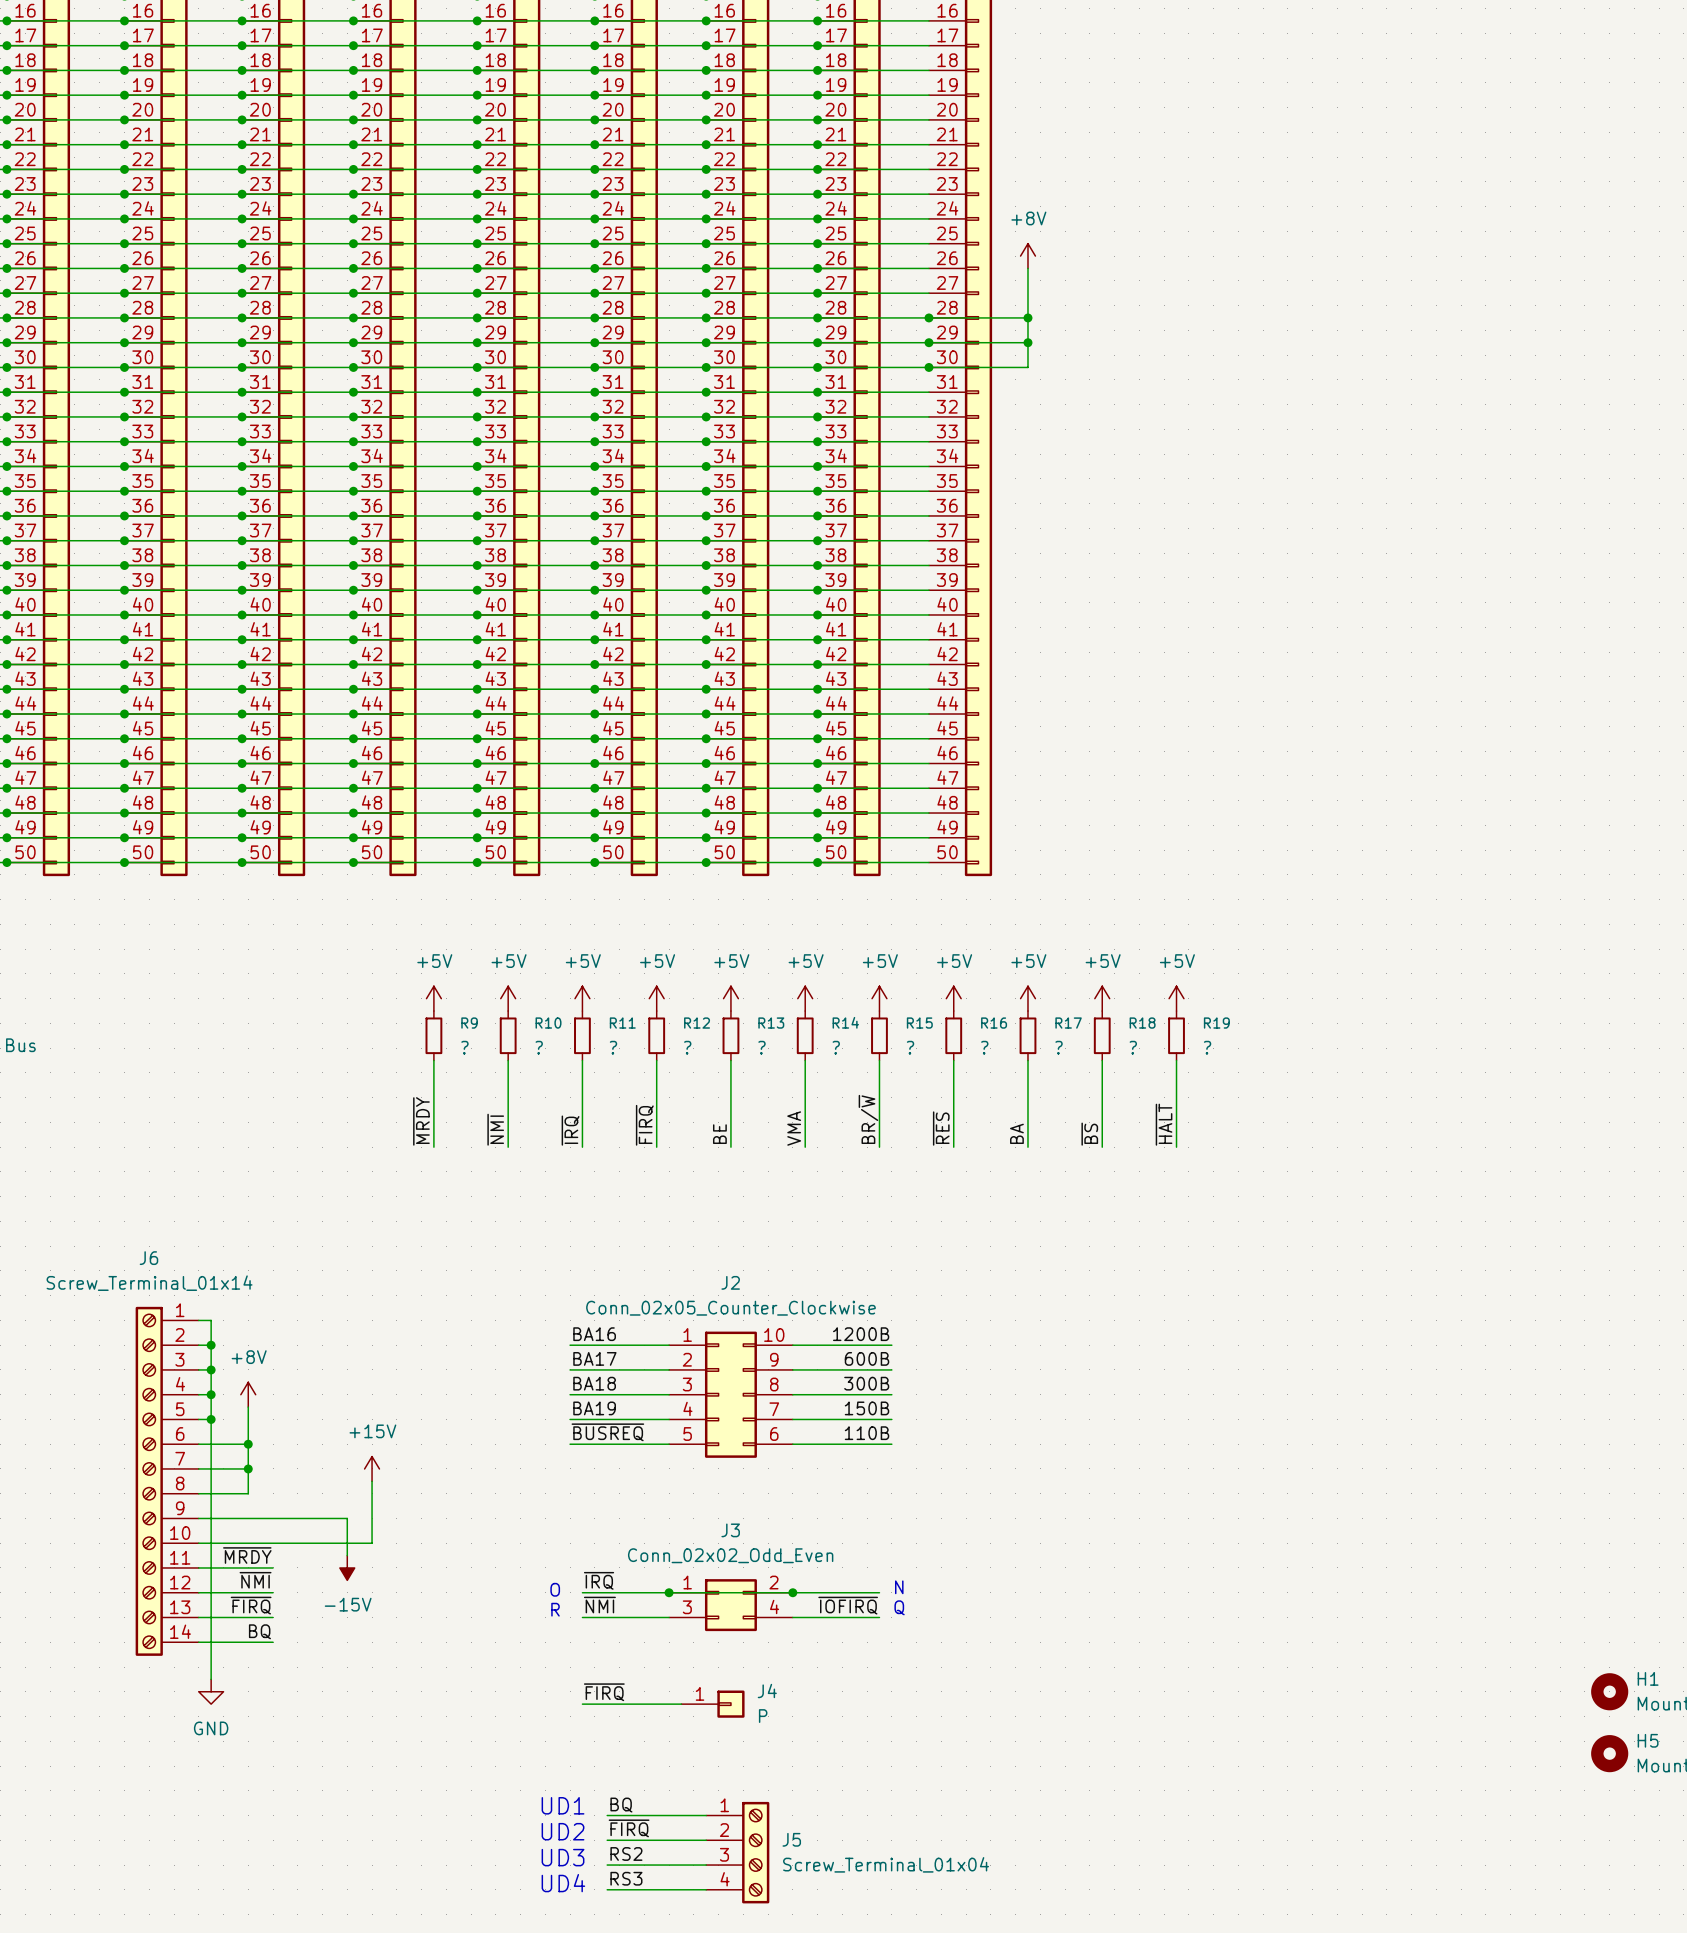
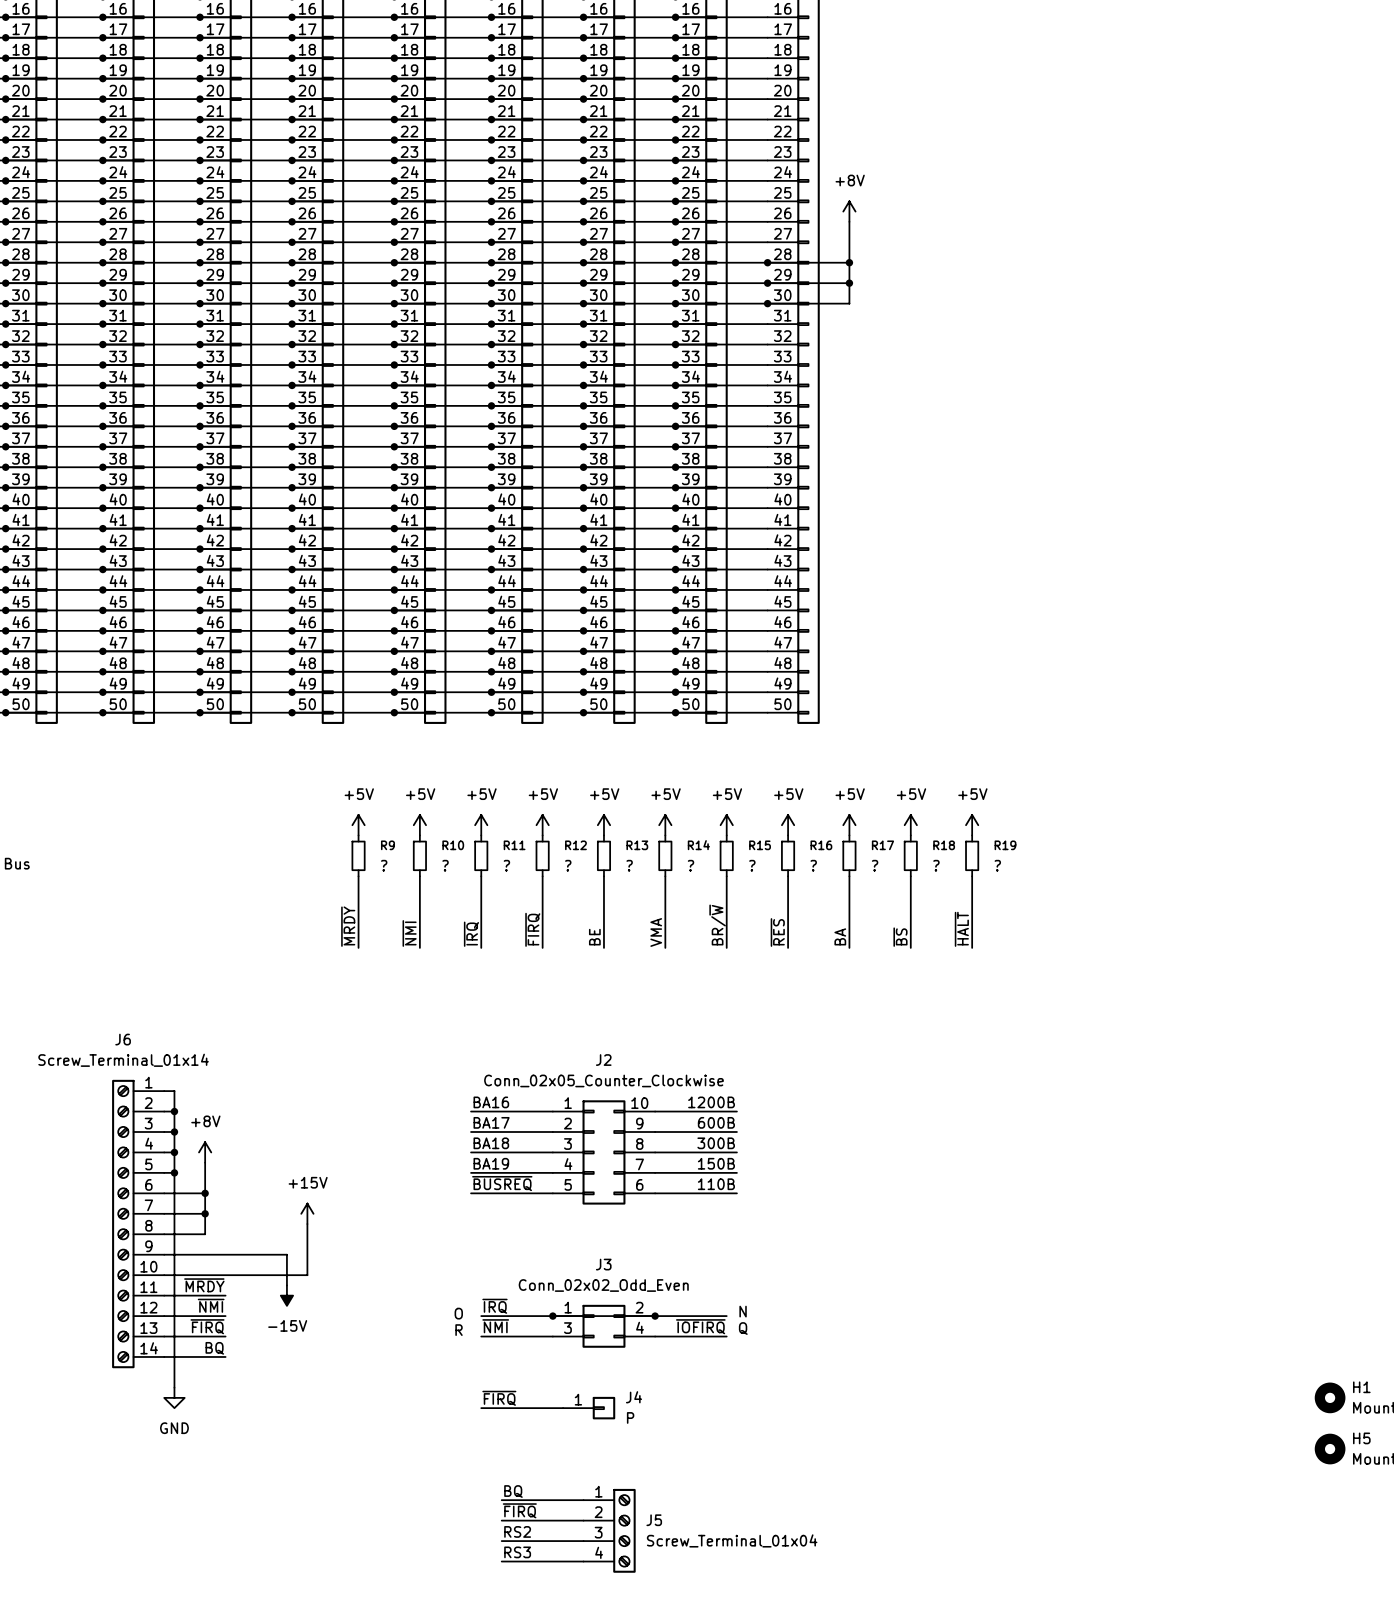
text: UD1 (563, 1805) -> none
text: UD2 (563, 1831) -> none
text: UD3 (563, 1857) -> none
text: UD4 (563, 1883) -> none

